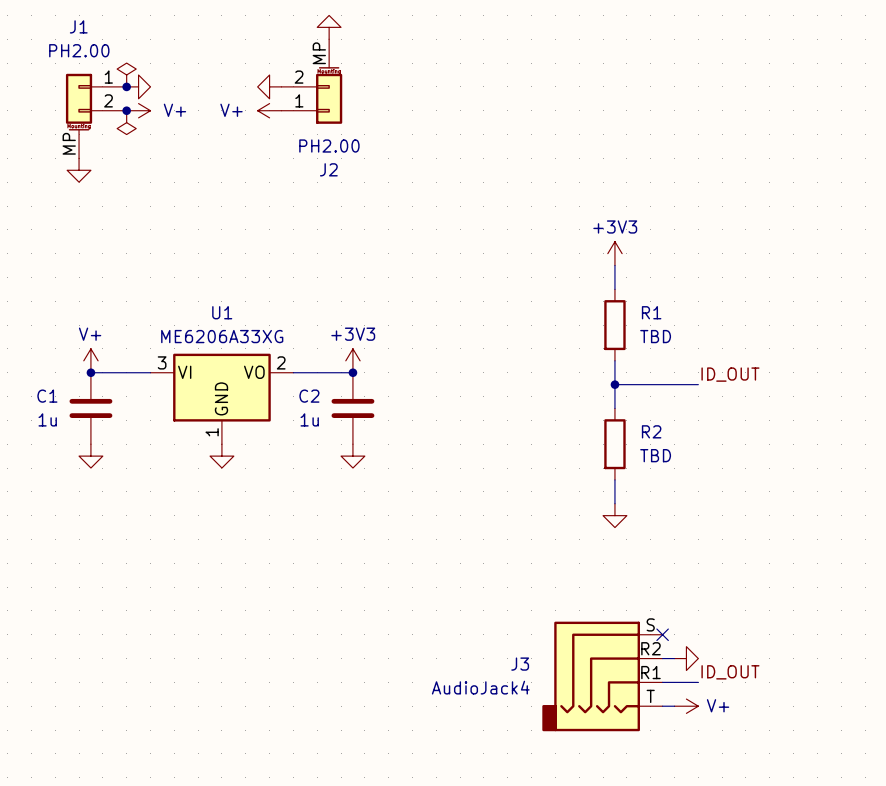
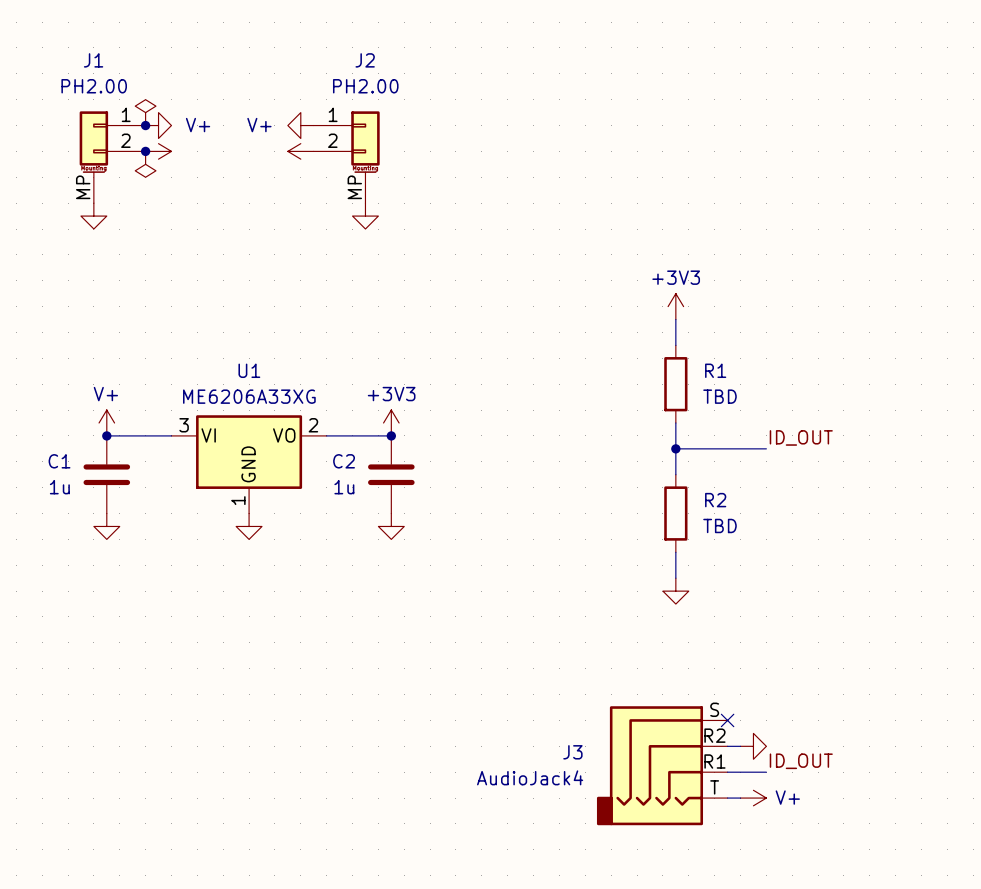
power symbol rotation: 0° (329, 27) -> 180° (365, 216)
power symbol position: (329, 27) -> (365, 216)
power symbol text: none -> V+ (198, 125)
power symbol text: none -> V+ (259, 125)
J2 flip: as is (329, 95) -> up-down (365, 142)
power symbol text: V+ (174, 110) -> none
power symbol text: V+ (231, 110) -> none

